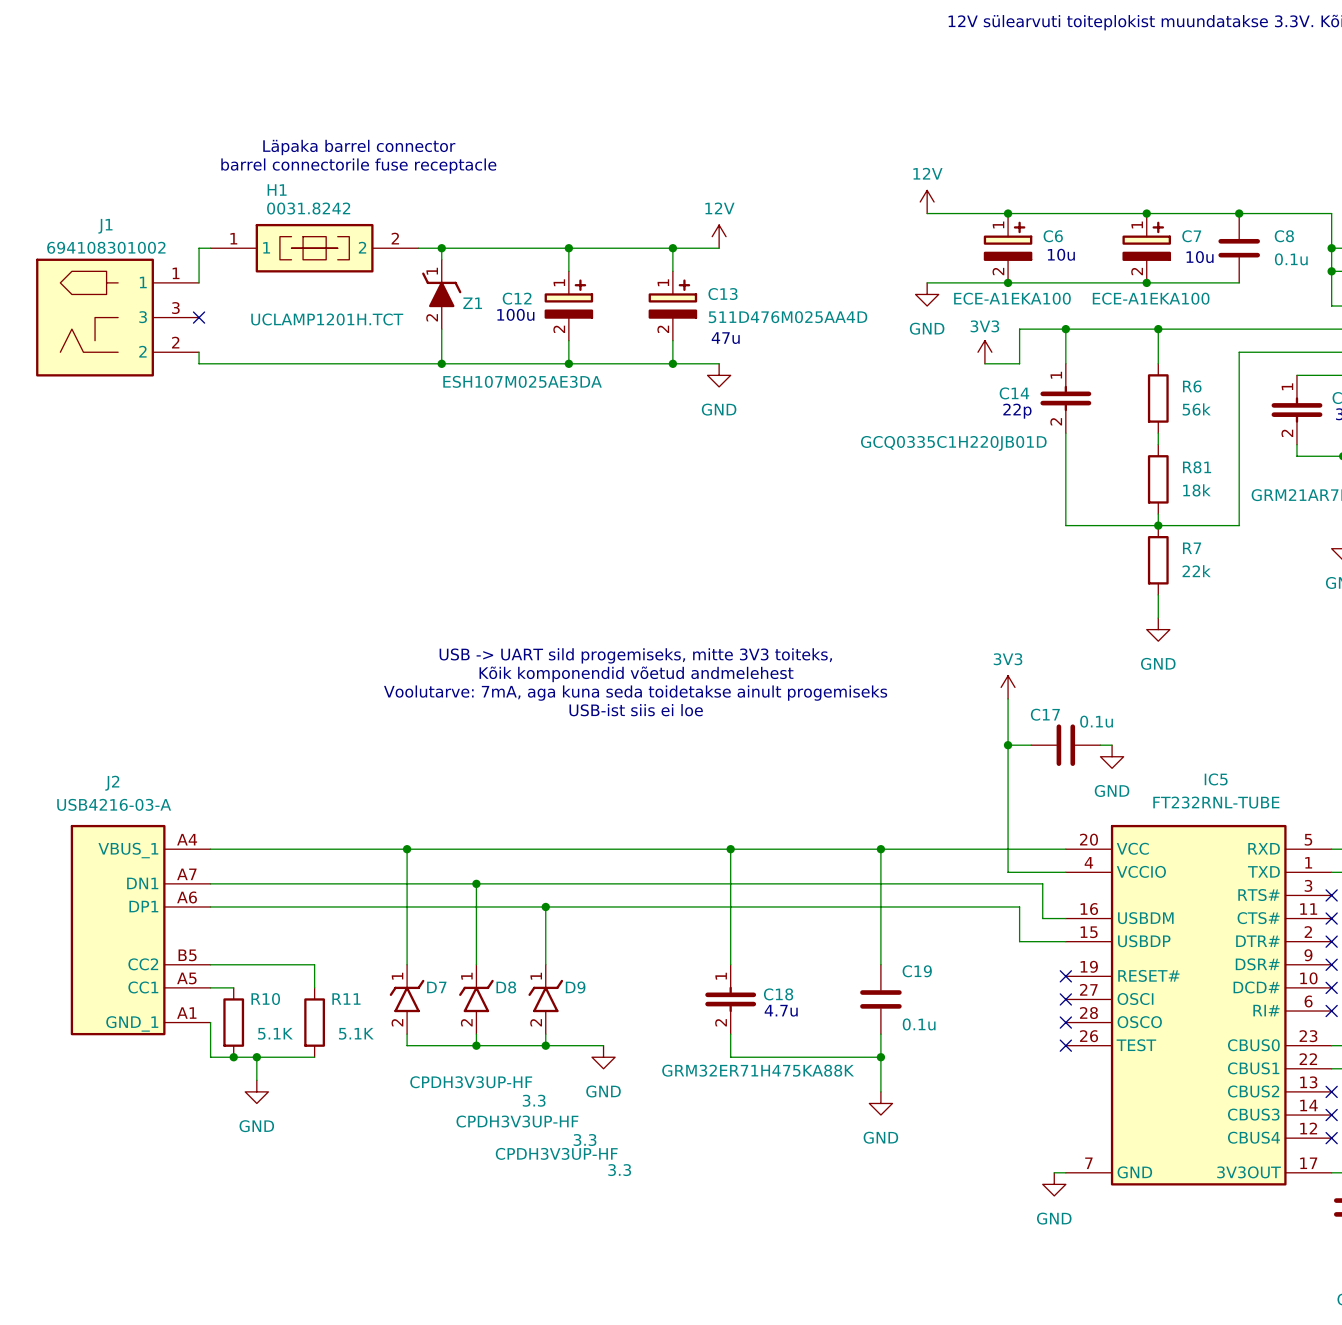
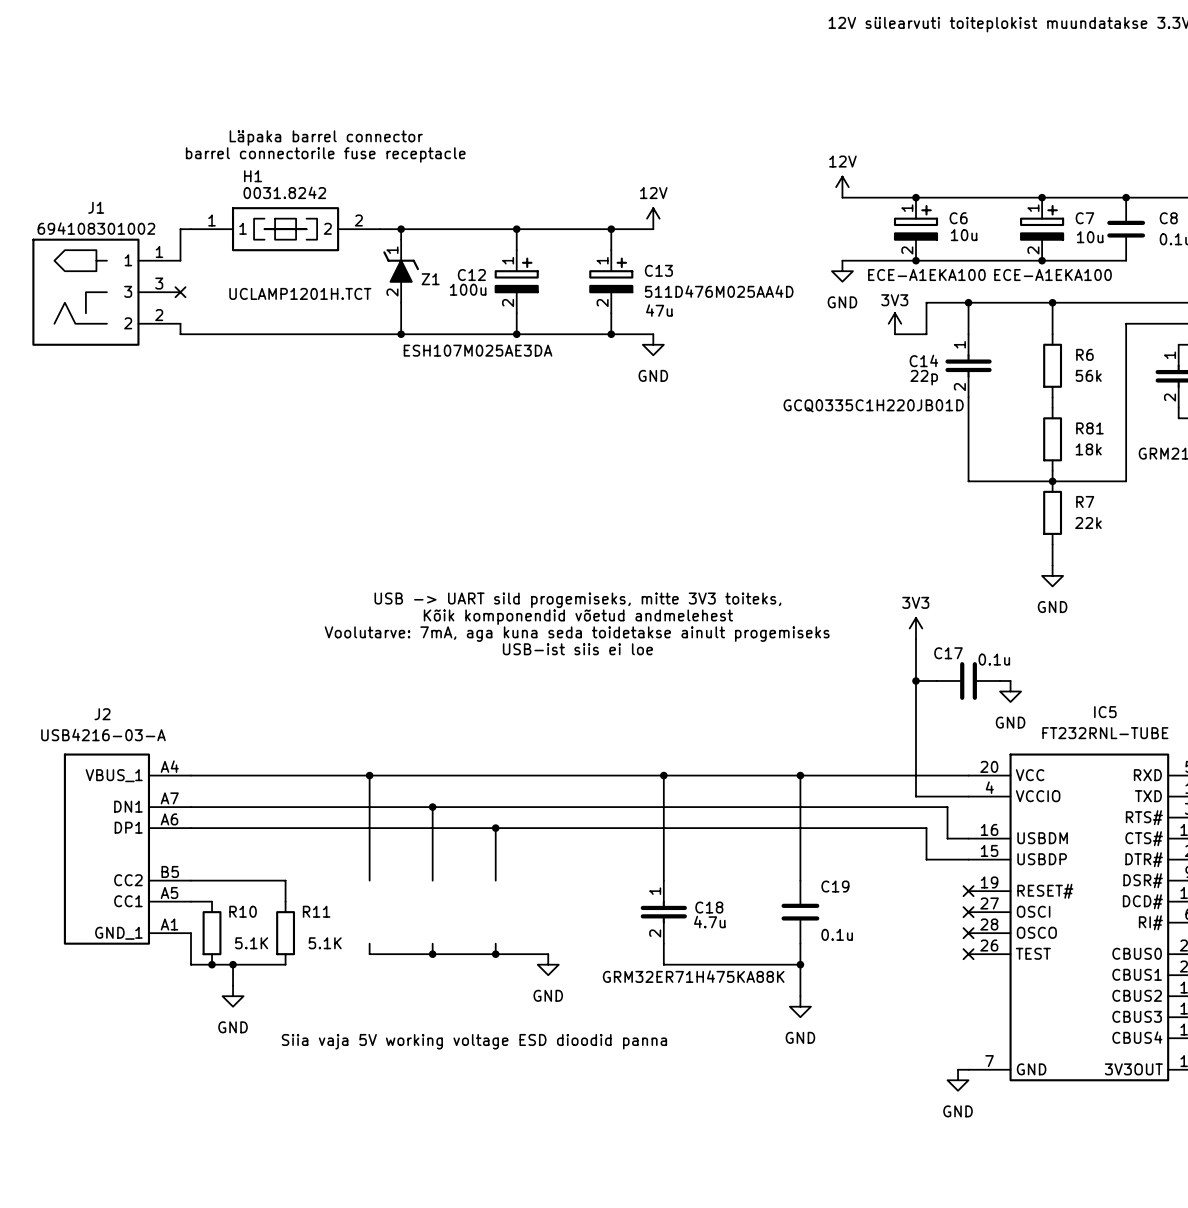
D7: CPDH3V3UP-HF (407, 999) -> none
D8: CPDH3V3UP-HF (476, 999) -> none
D9: CPDH3V3UP-HF (545, 999) -> none
text: none -> Siia vaja 5V working voltage ESD dioodid panna (474, 1041)

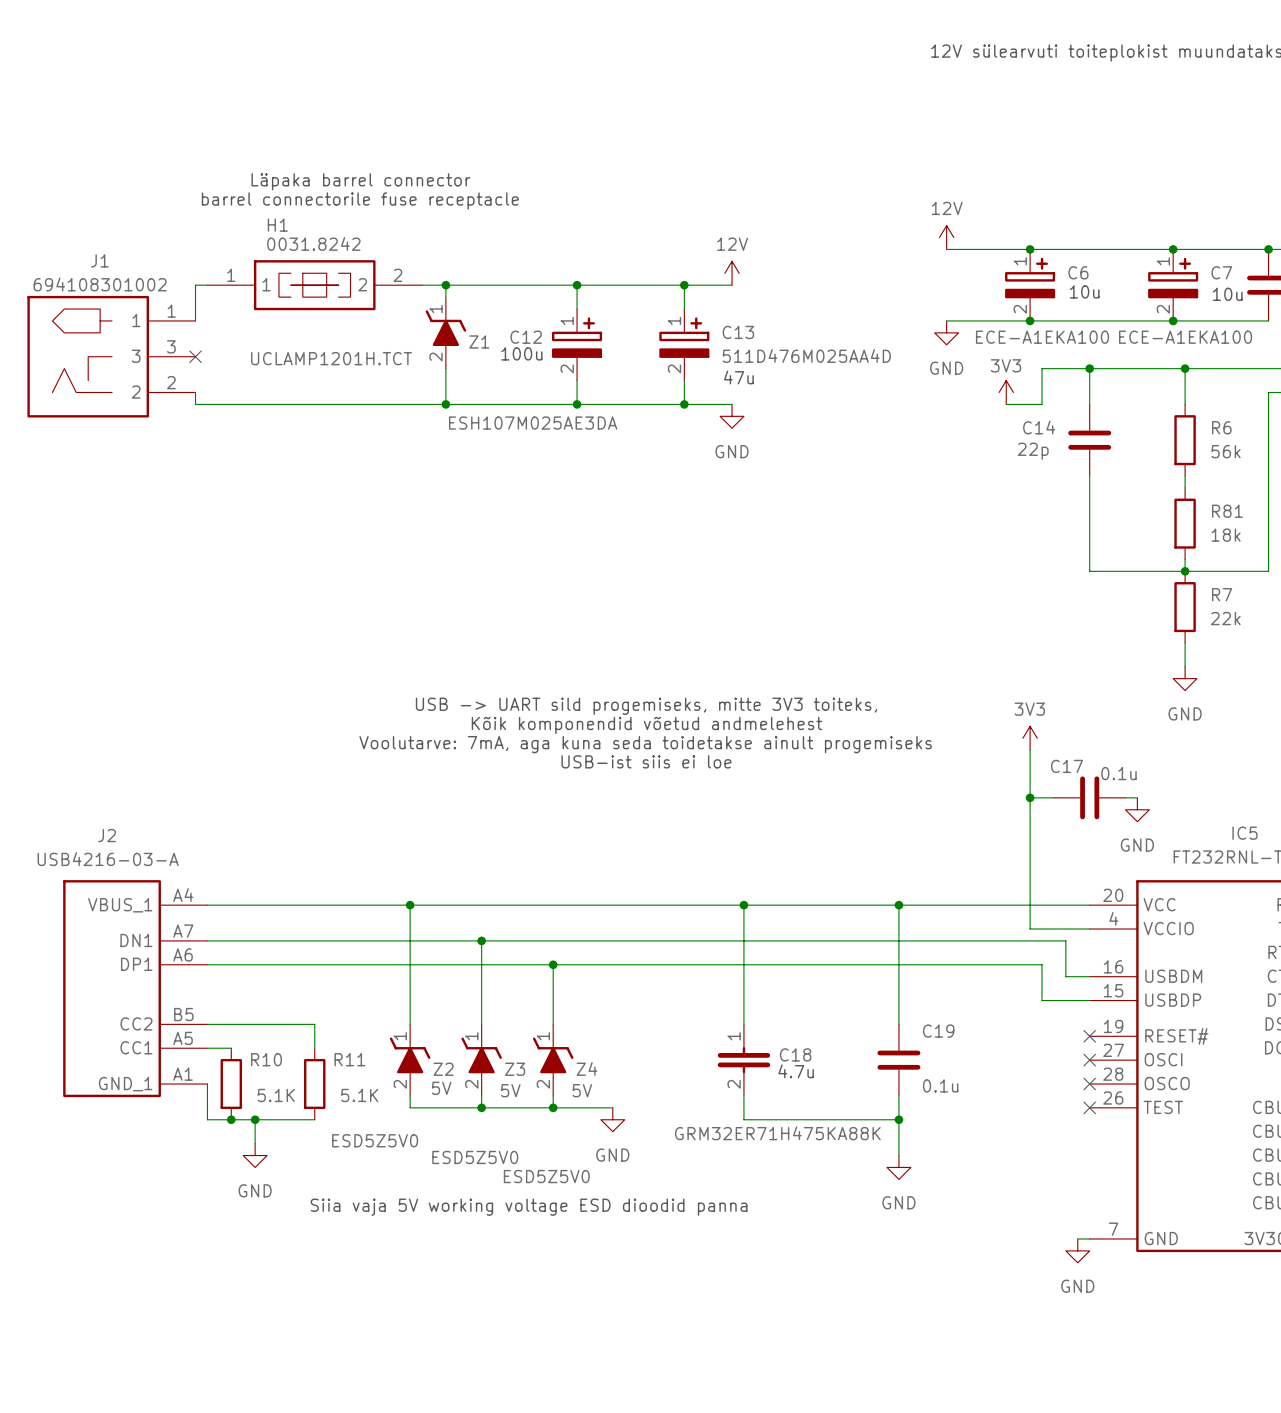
C14 symbol: [945, 334, 992, 398] -> [1068, 404, 1112, 476]
text: 22p (924, 377) -> none
C14 value: GCQ0335C1H220JB01D (873, 405) -> 22p (1033, 451)
Z2: none -> ESD5Z5V0 (410, 1060)
Z3: none -> ESD5Z5V0 (481, 1060)
Z4: none -> ESD5Z5V0 (553, 1060)

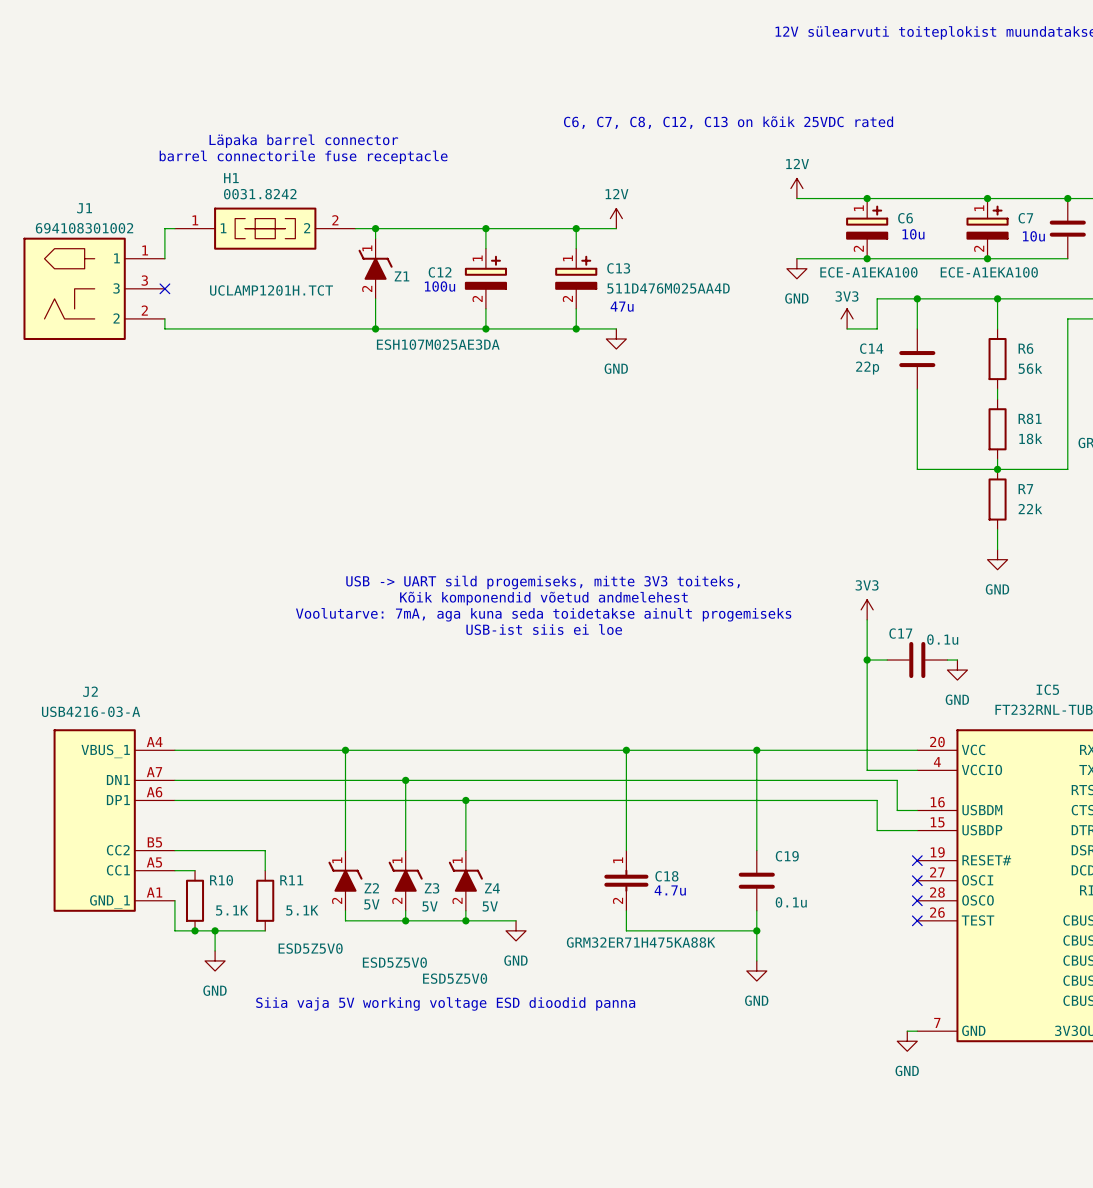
text: none -> C6, C7, C8, C12, C13 on kõik 25VDC rated (728, 122)

